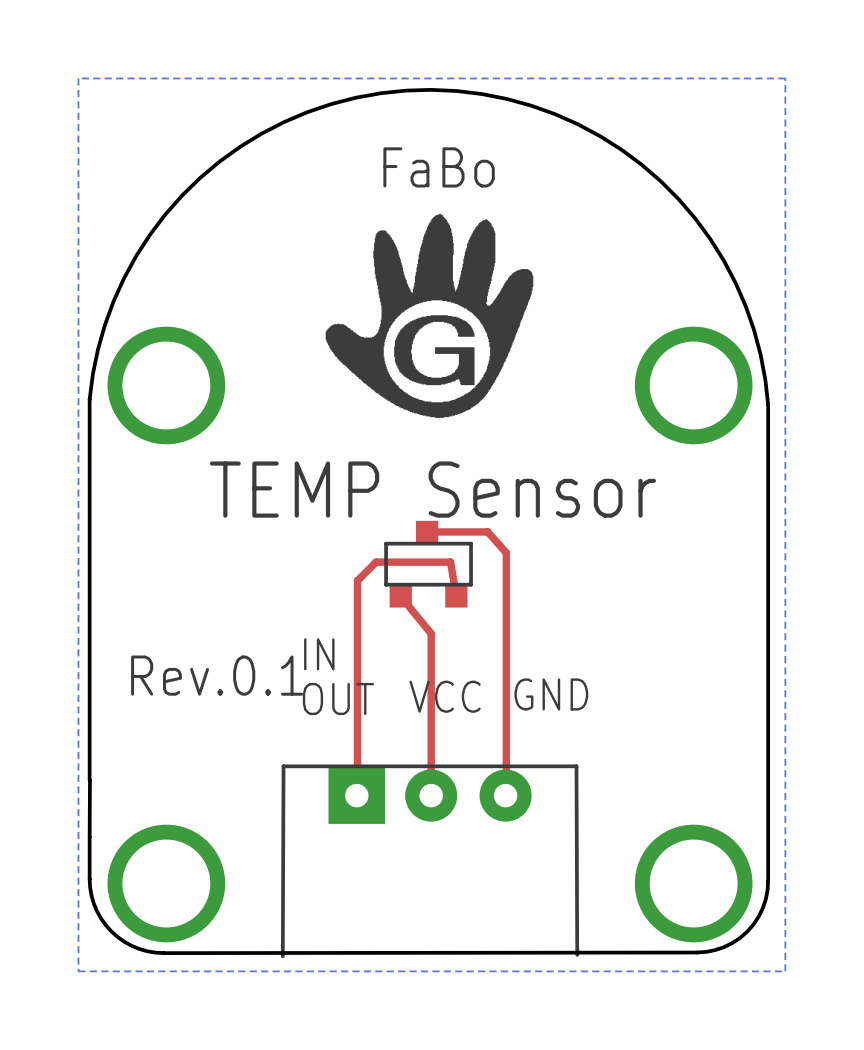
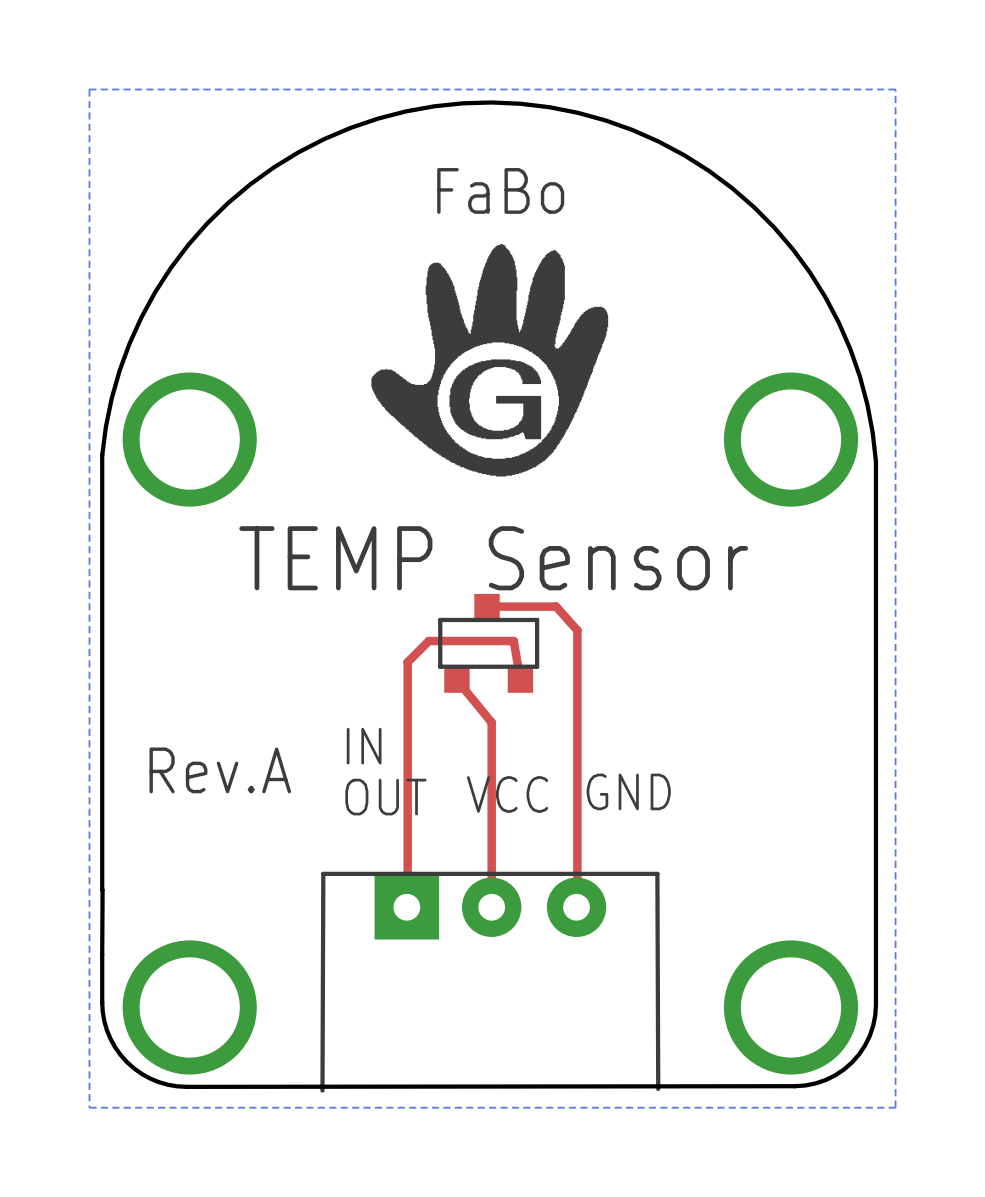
text: Rev.0.1 (217, 675) -> Rev.A (220, 770)

